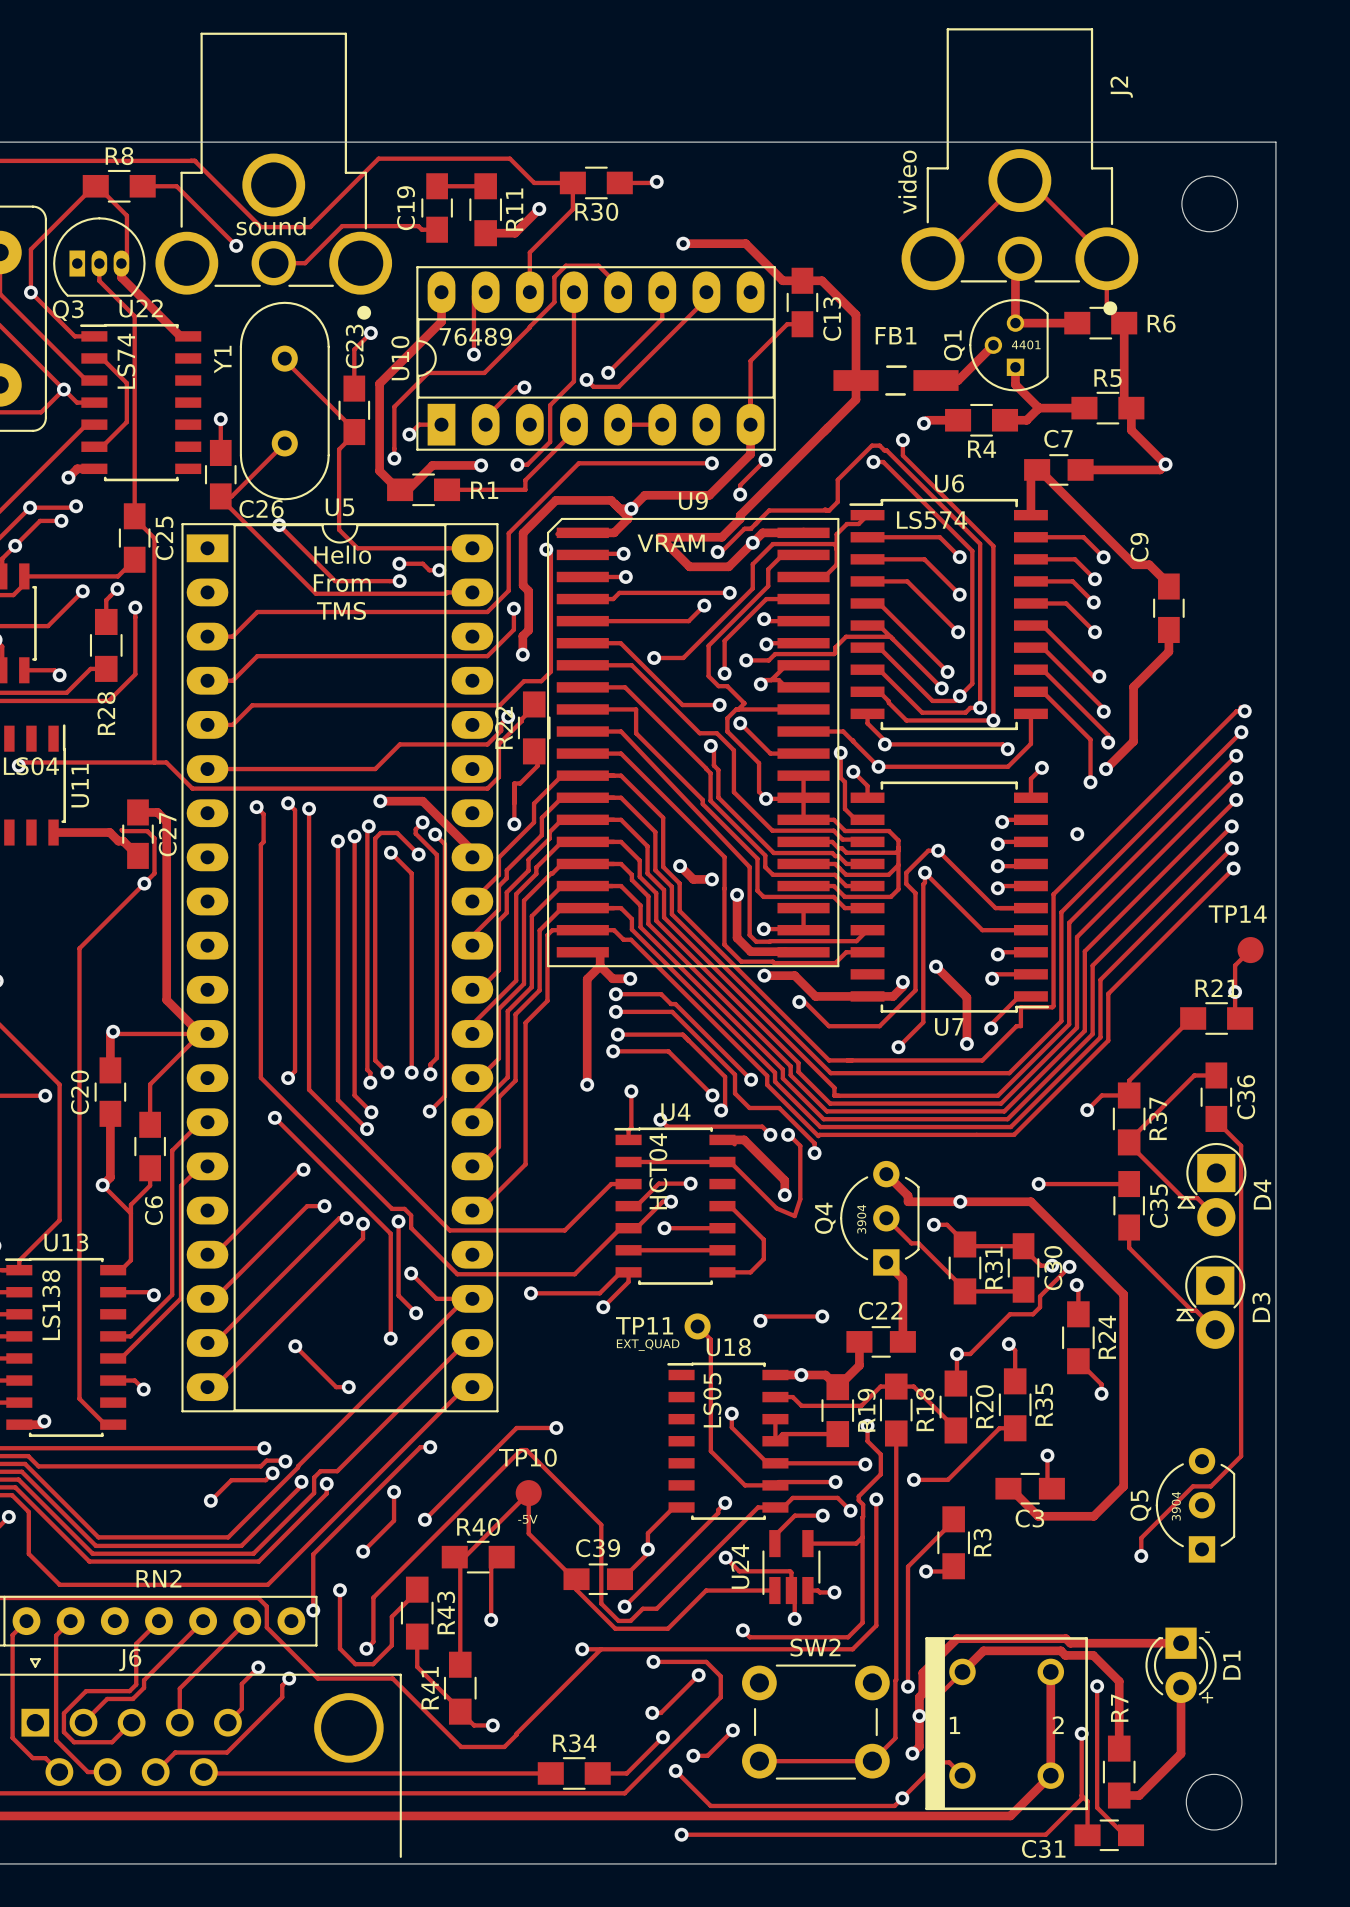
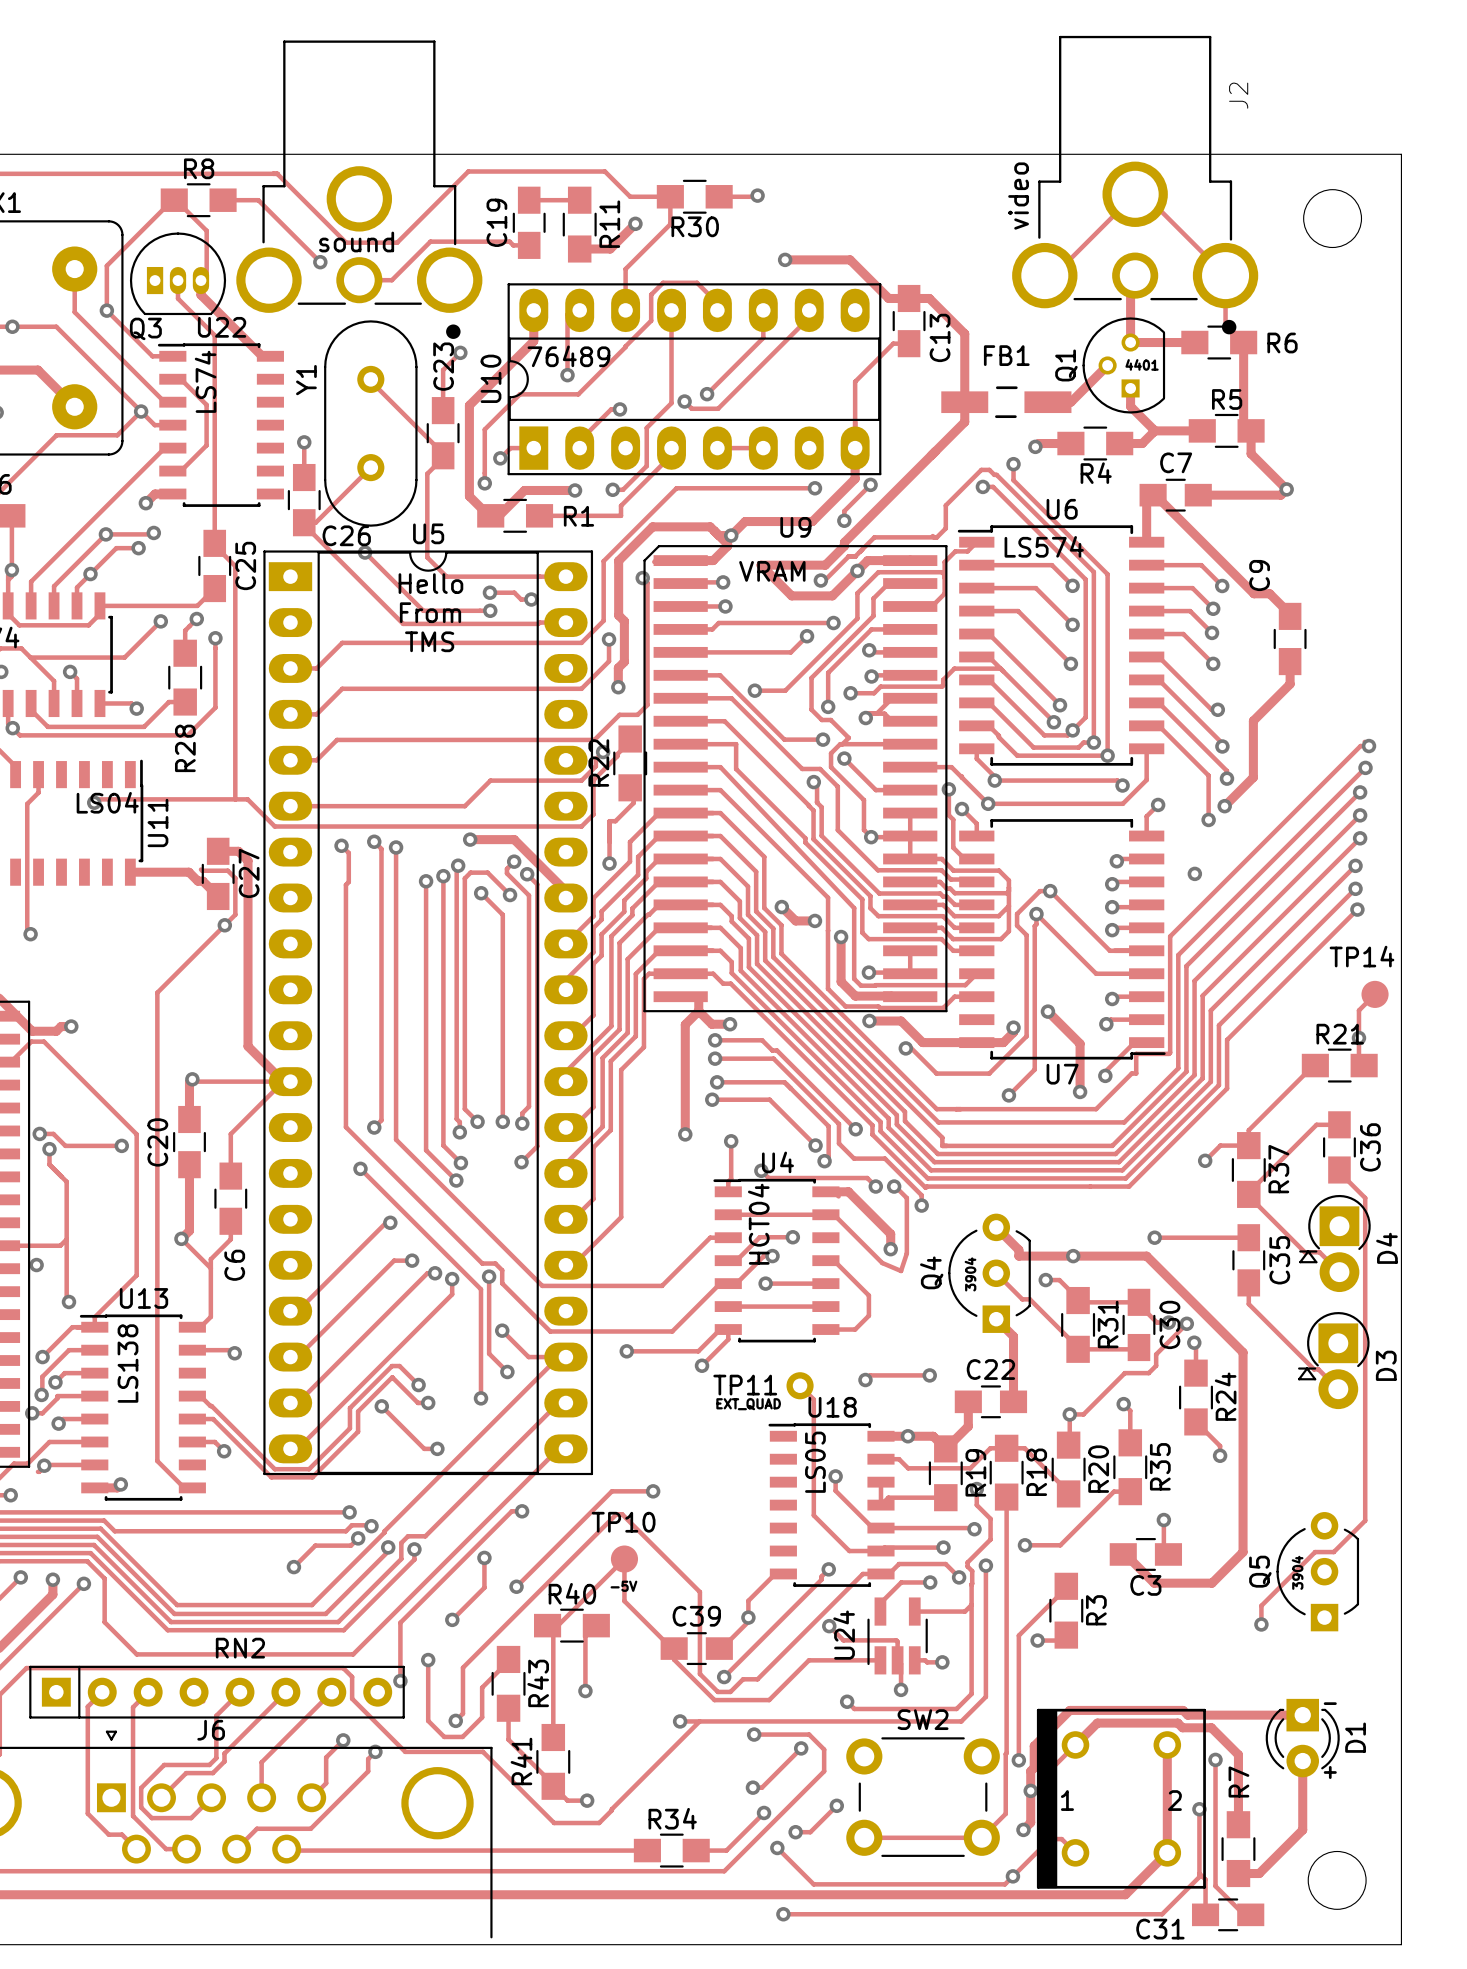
track: (207, 1122) (200, 1122) (172, 1150) (172, 1294) (130, 1336) (121, 1336) -> (418, 1385) (399, 1366) (392, 1366) (349, 1408) (349, 1428) (309, 1469) (274, 1469) (200, 1396)
track: (207, 1166) (200, 1166) (181, 1185) (181, 1298) (121, 1358) -> (428, 1402) (417, 1402) (392, 1377) (358, 1411) (358, 1431) (312, 1477) (271, 1477) (213, 1419) (200, 1419)
via: none -> (418, 1385)
via: none -> (428, 1402)

